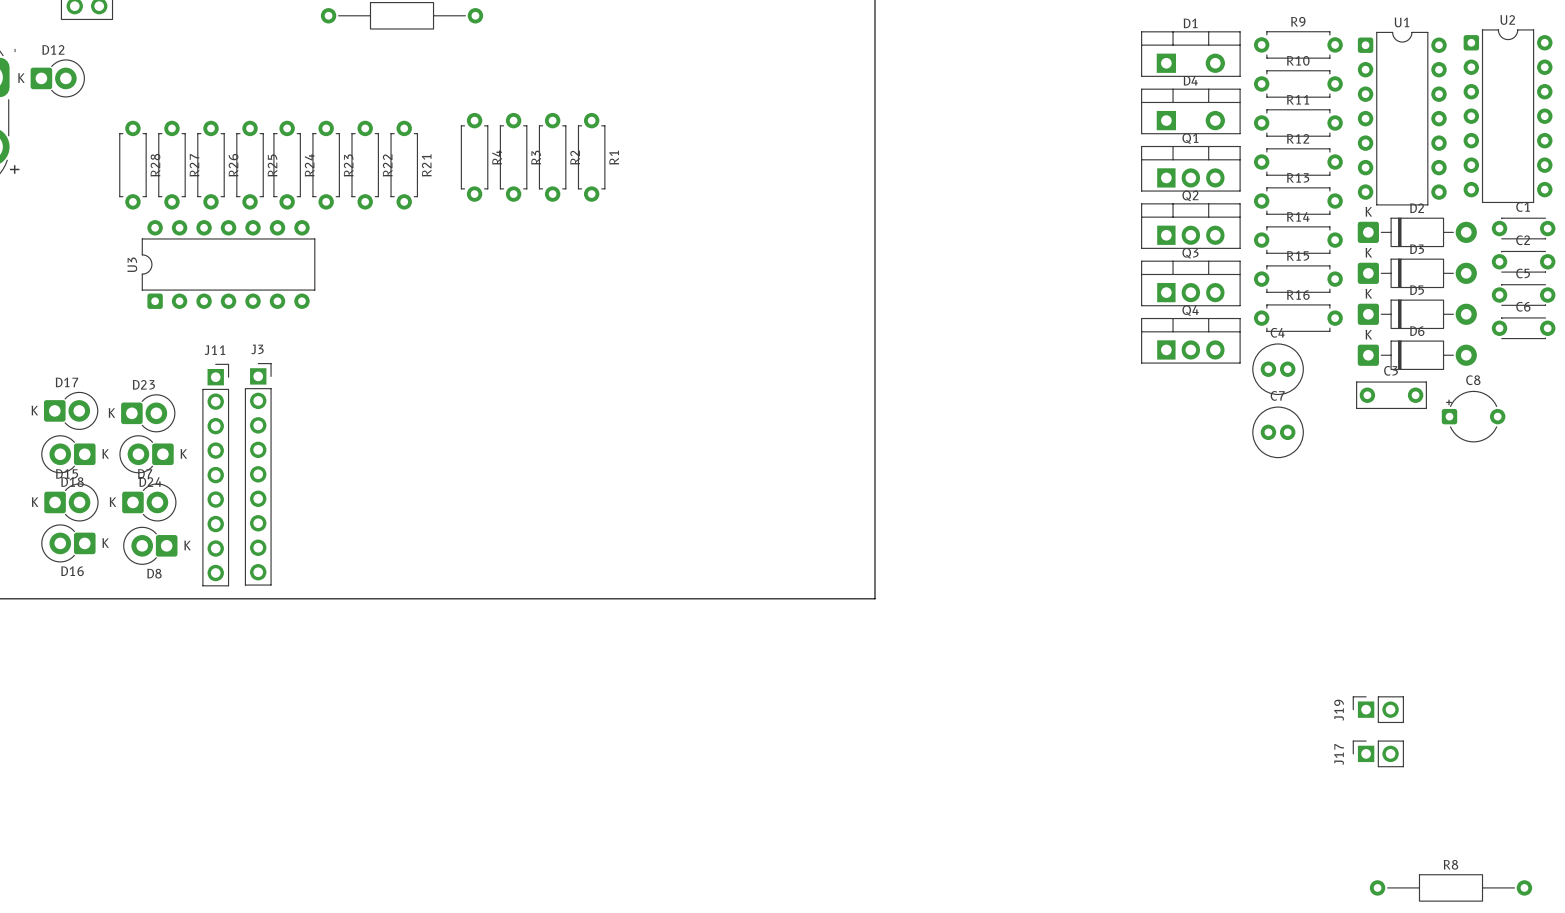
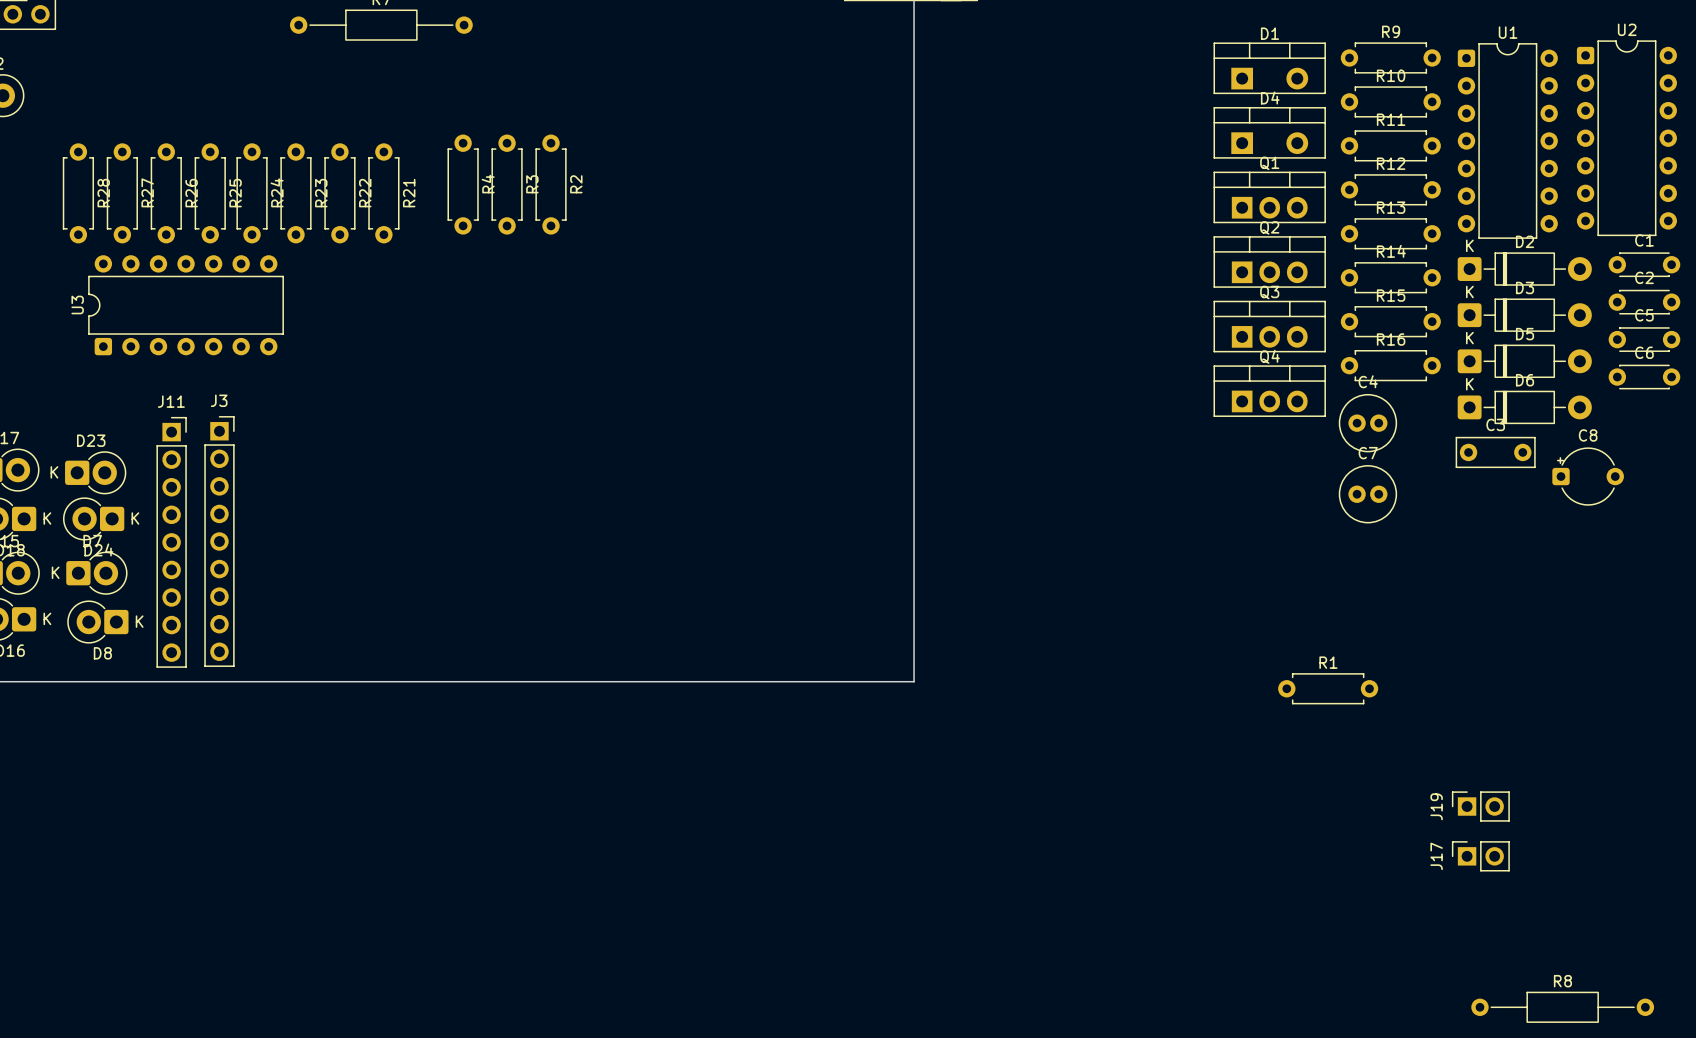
R1 rotation: 0° (591, 157) -> 90° clockwise (1328, 688)
R1 position: (591, 157) -> (1328, 688)
R1 name position: R1 (614, 157) -> R1 (1328, 662)

